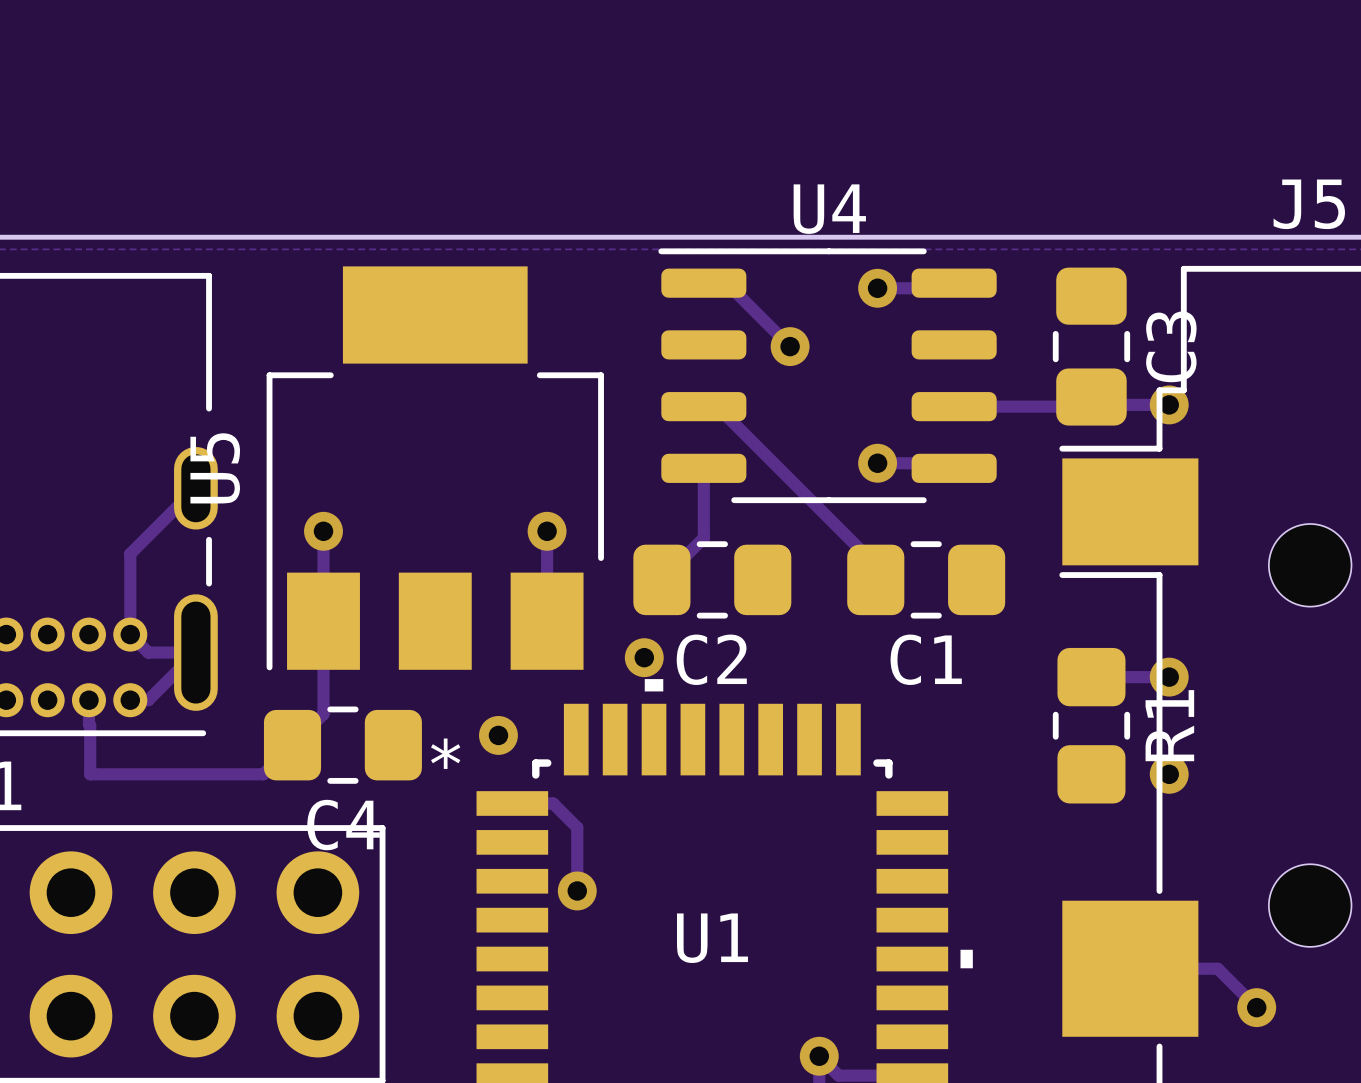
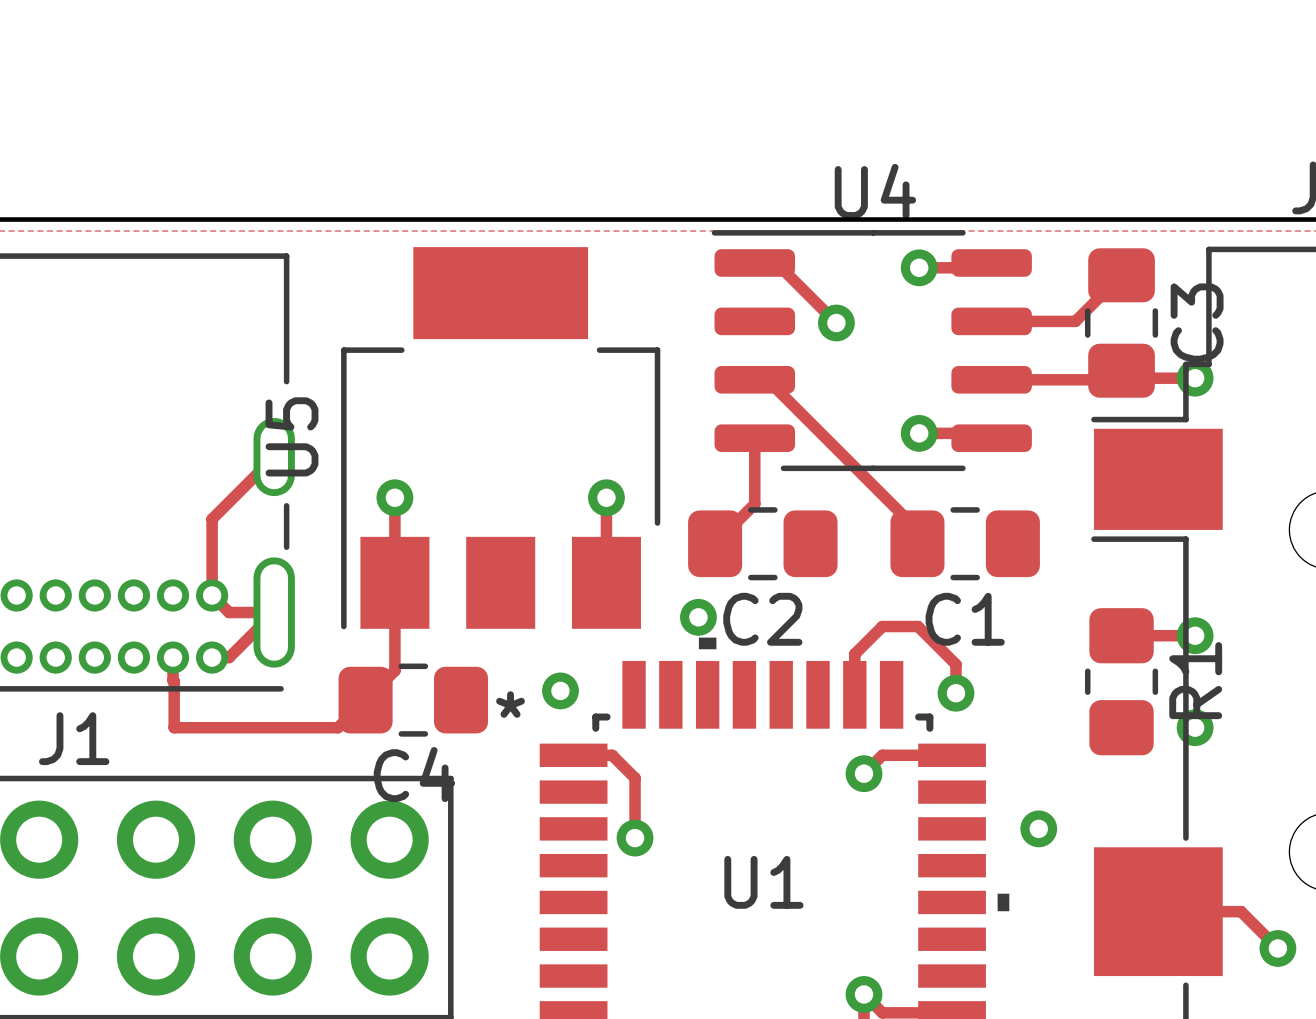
track: none -> (1121, 275) (1075, 321) (991, 321)
track: none -> (955, 693) (955, 664) (918, 626) (882, 626) (854, 654) (854, 694)
via: none -> (955, 693)
track: none -> (952, 755) (882, 755) (864, 773)
via: none -> (864, 773)
via: none -> (1038, 828)

